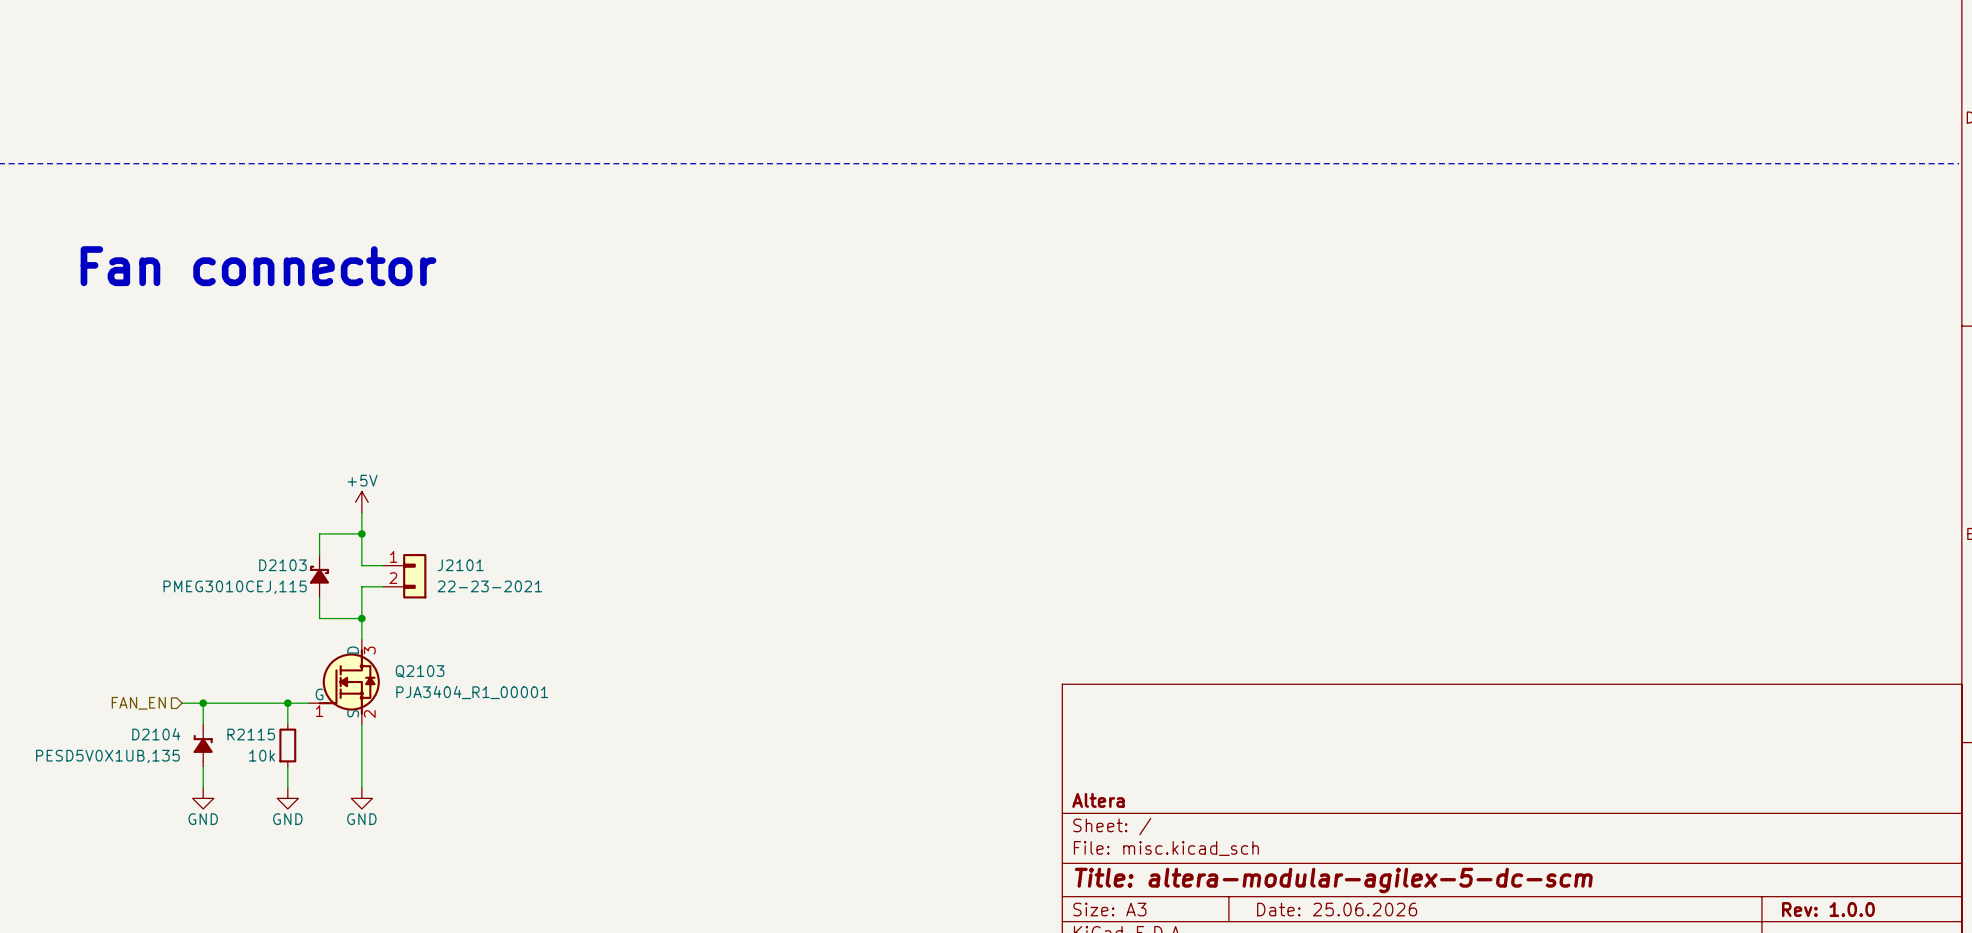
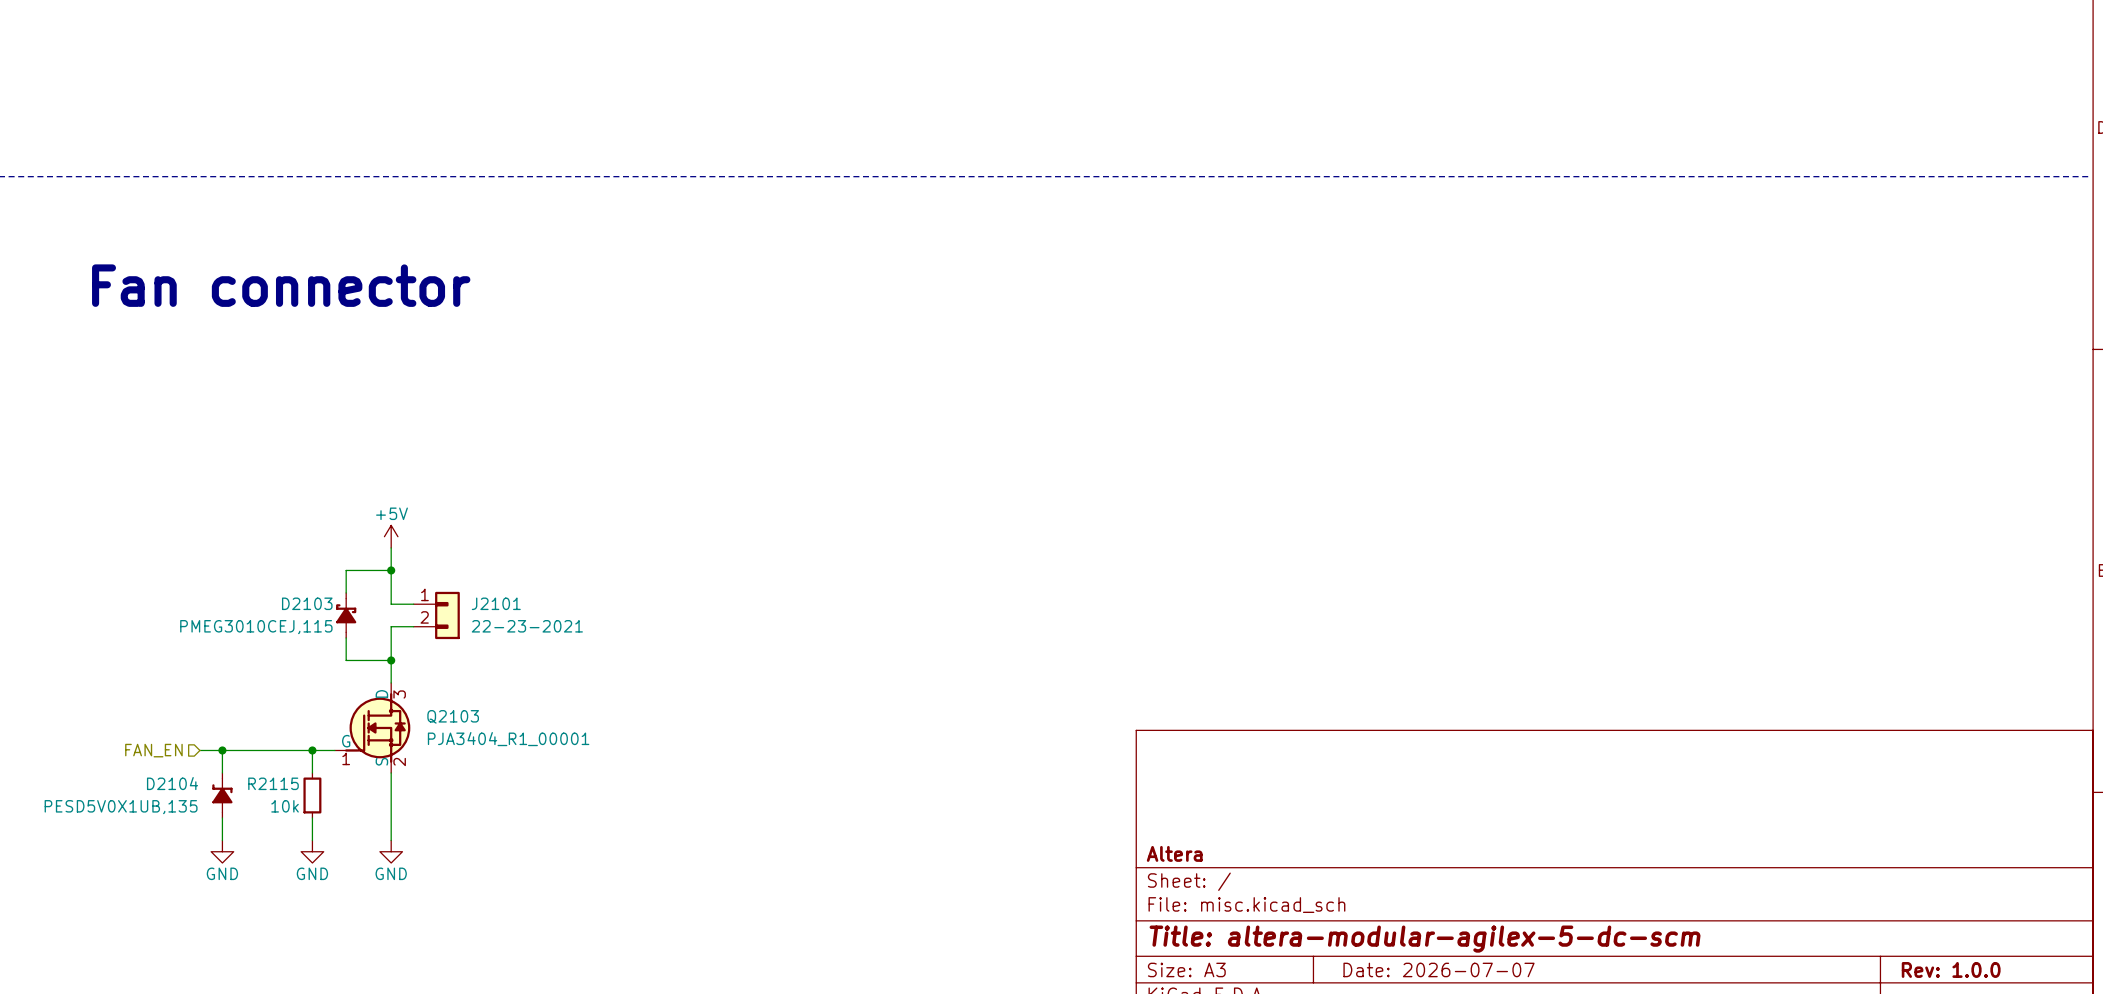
title block: Date: 25.06.2026 (1337, 909) -> Date: 2026-07-07 (1439, 969)

